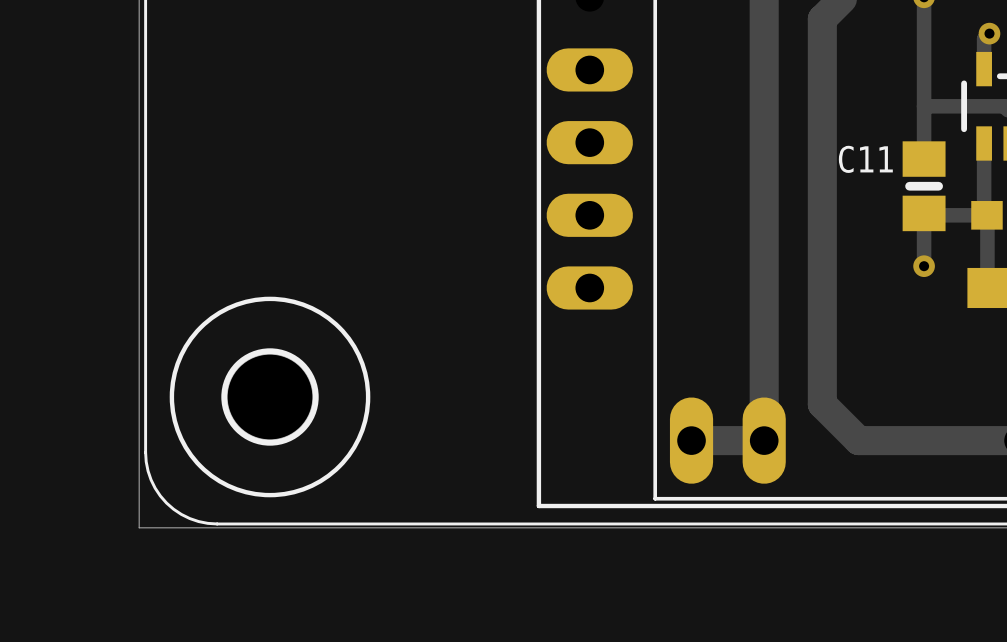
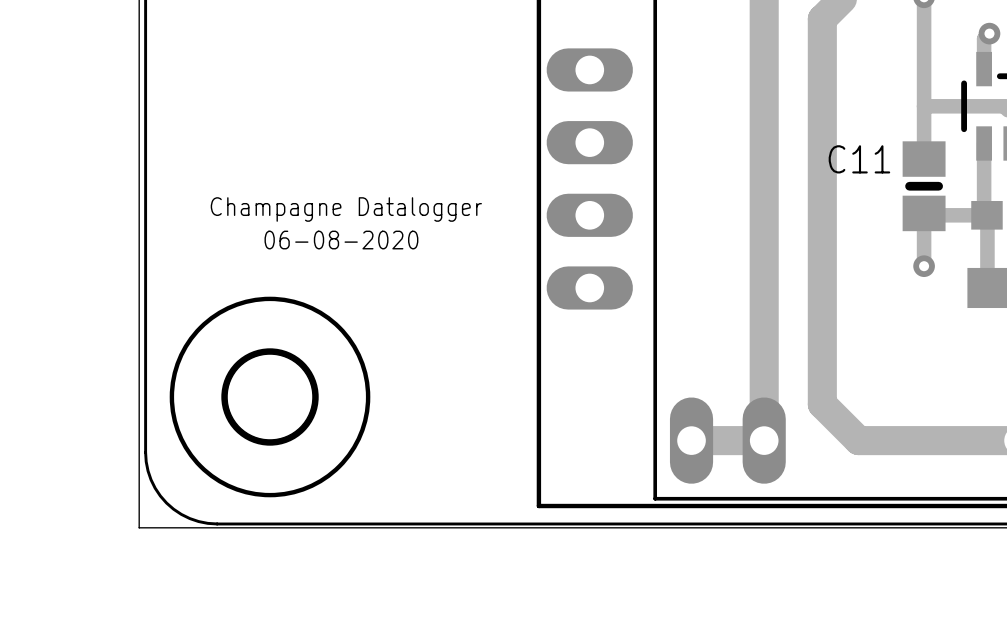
text: none -> Champagne Datalogger (346, 209)
text: none -> 06-08-2020 (341, 240)

